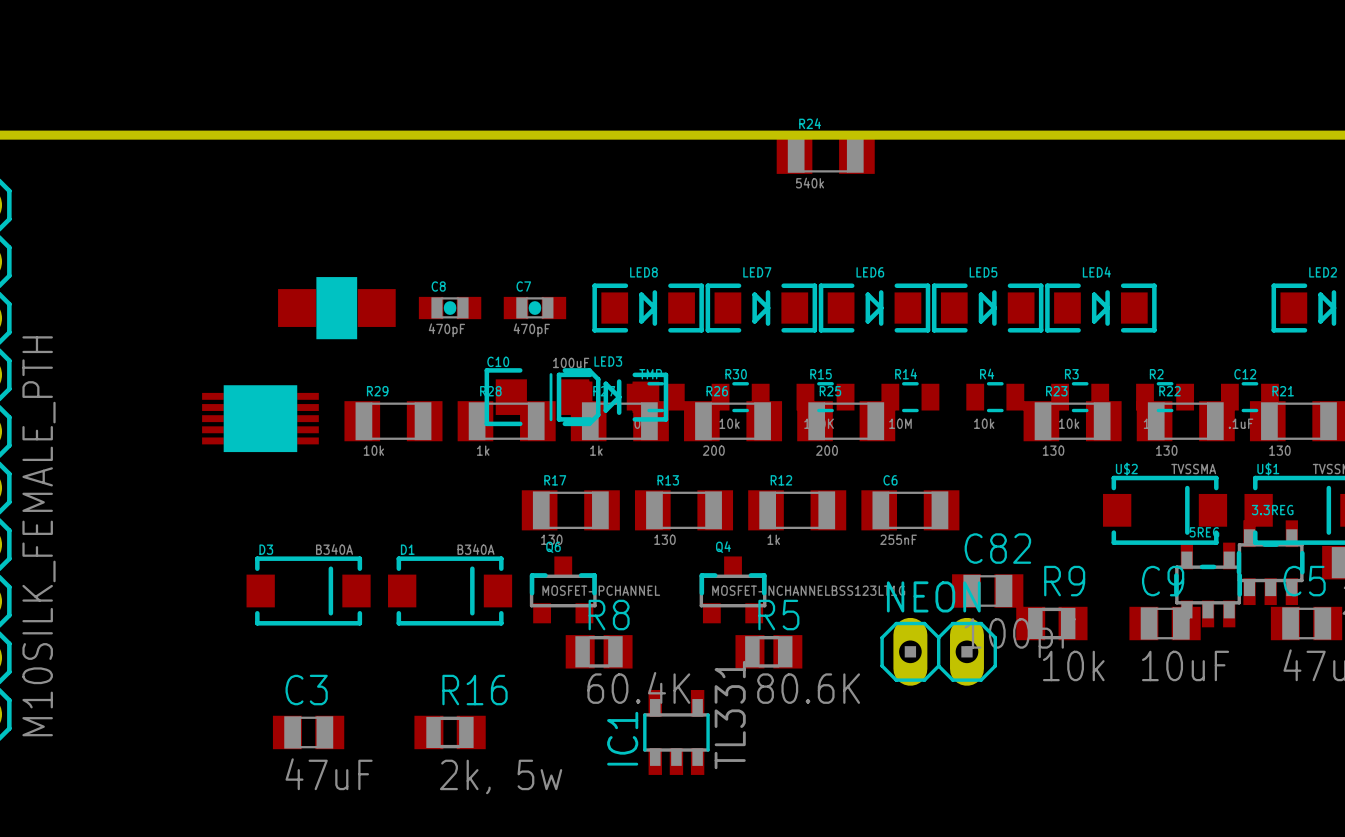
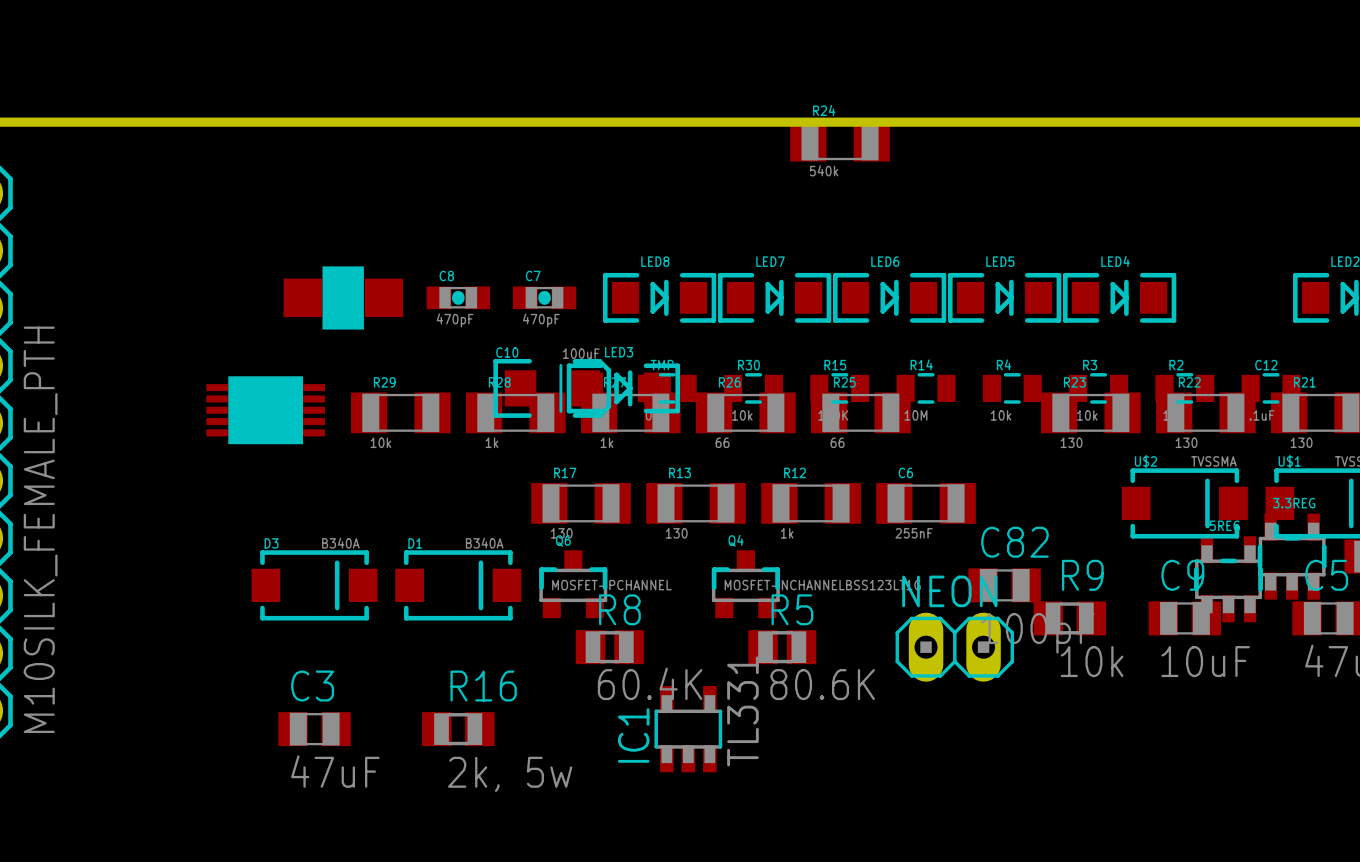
R26 value: 200 (713, 450) -> 66 (722, 442)
R25 value: 200 (827, 450) -> 66 (837, 442)

